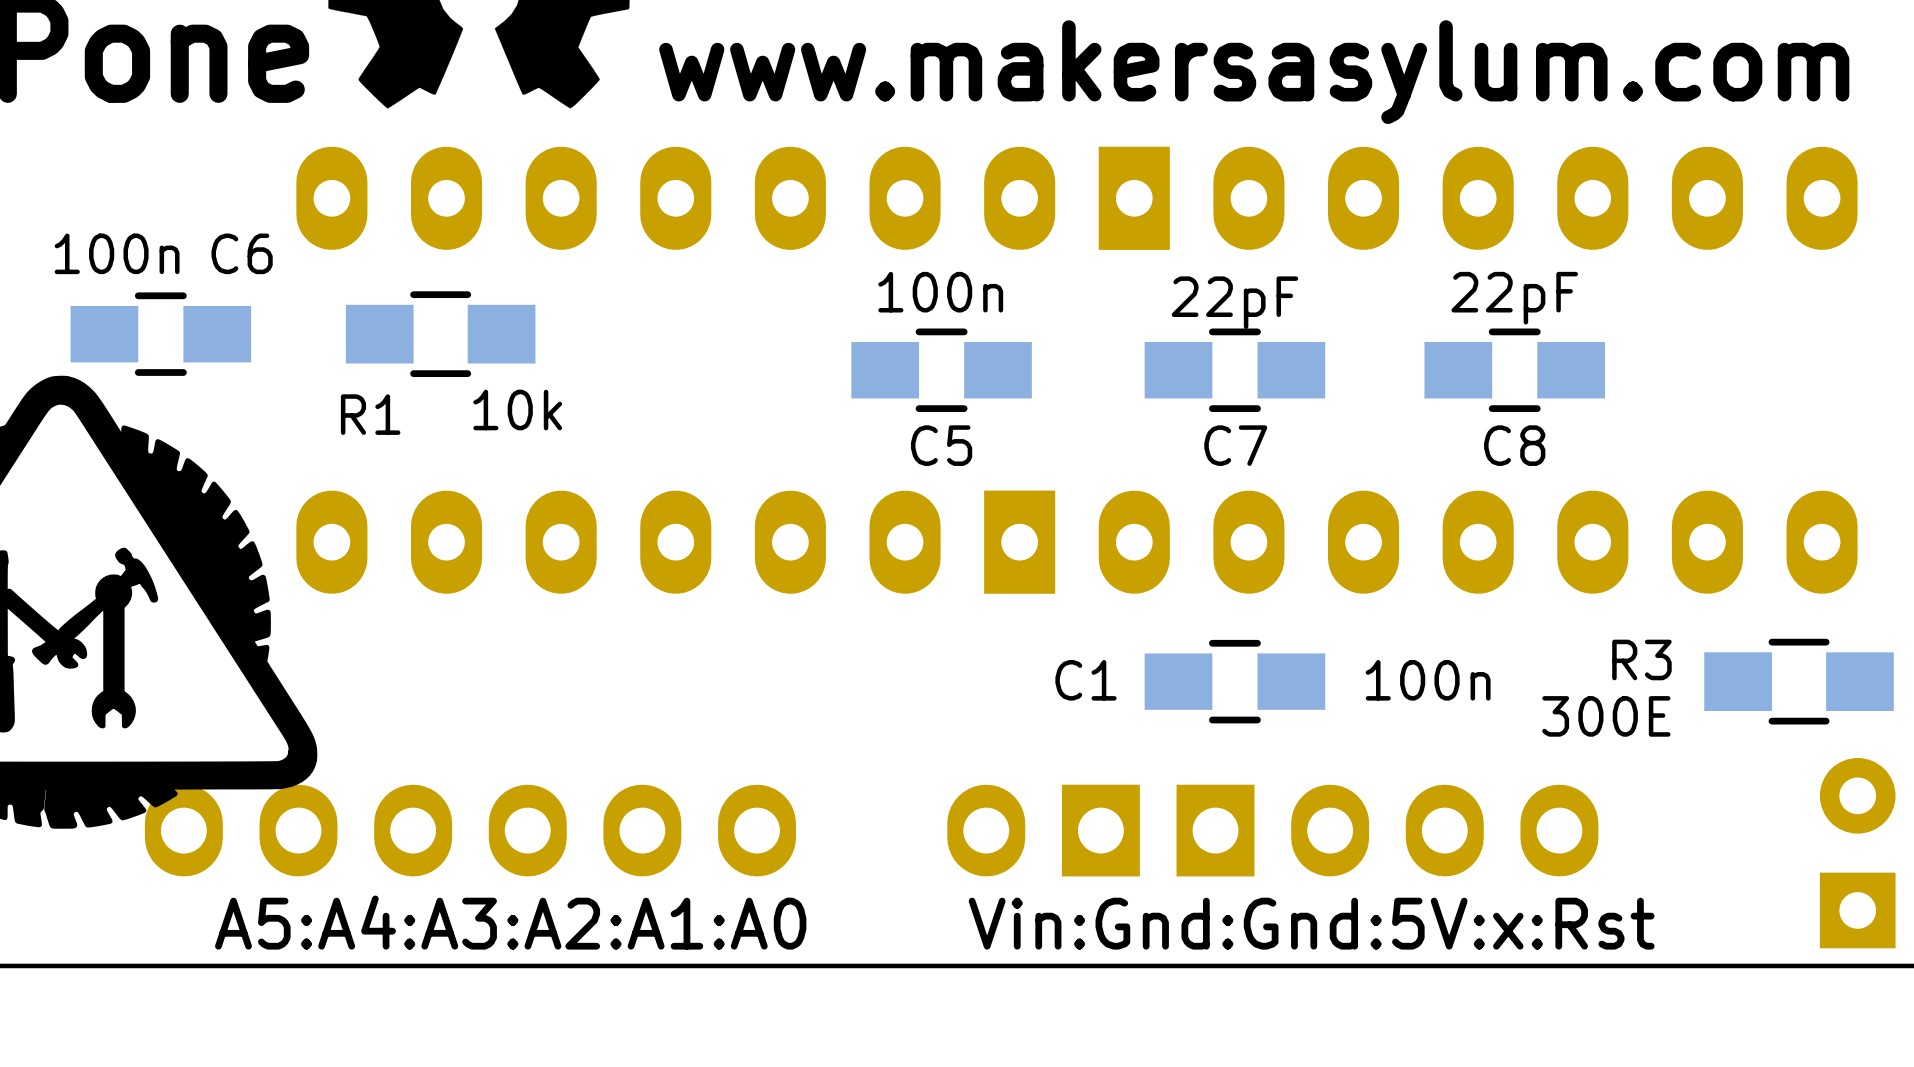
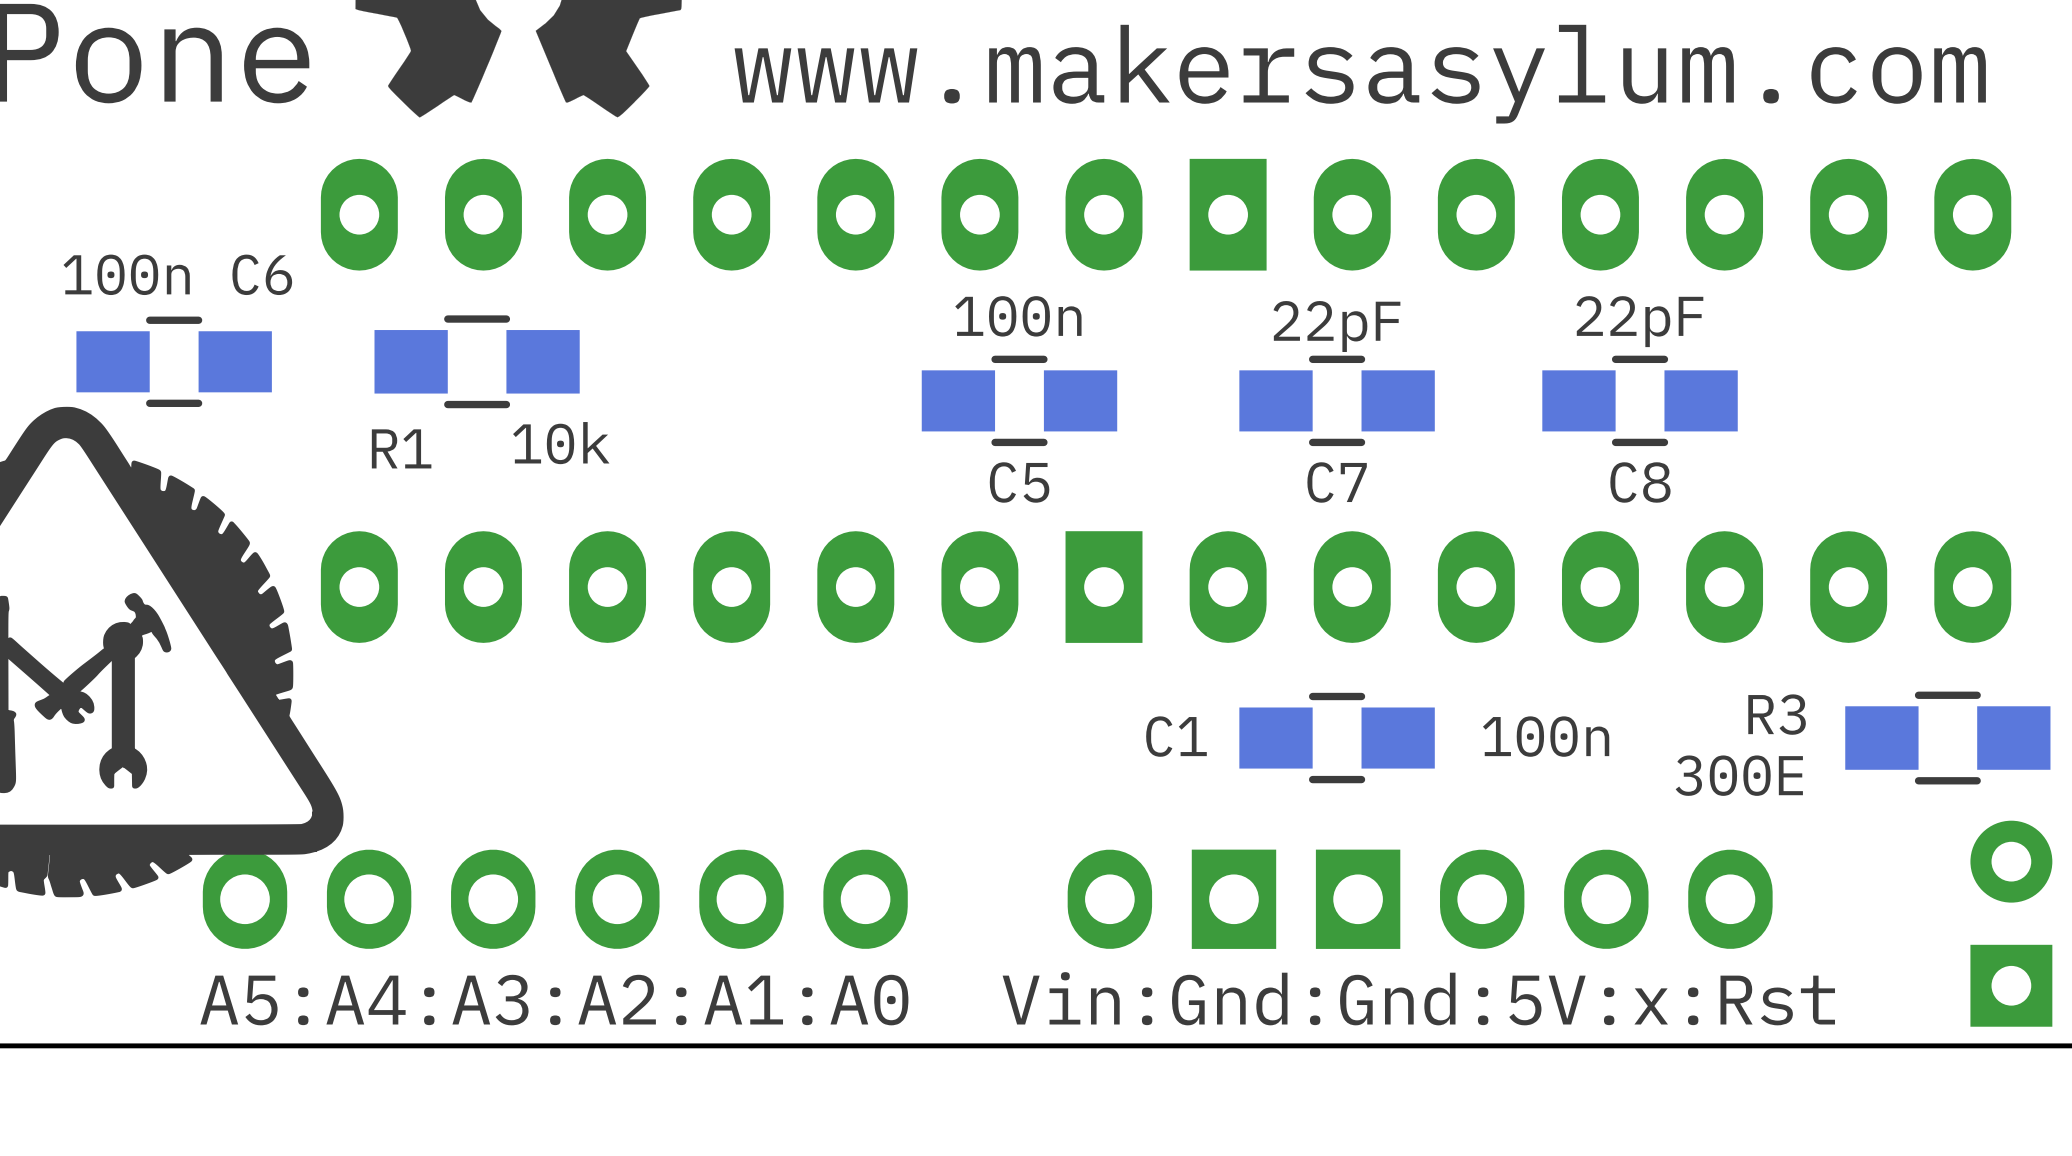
part position: (470, 830) -> (555, 899)
part position: (1272, 830) -> (1420, 899)

